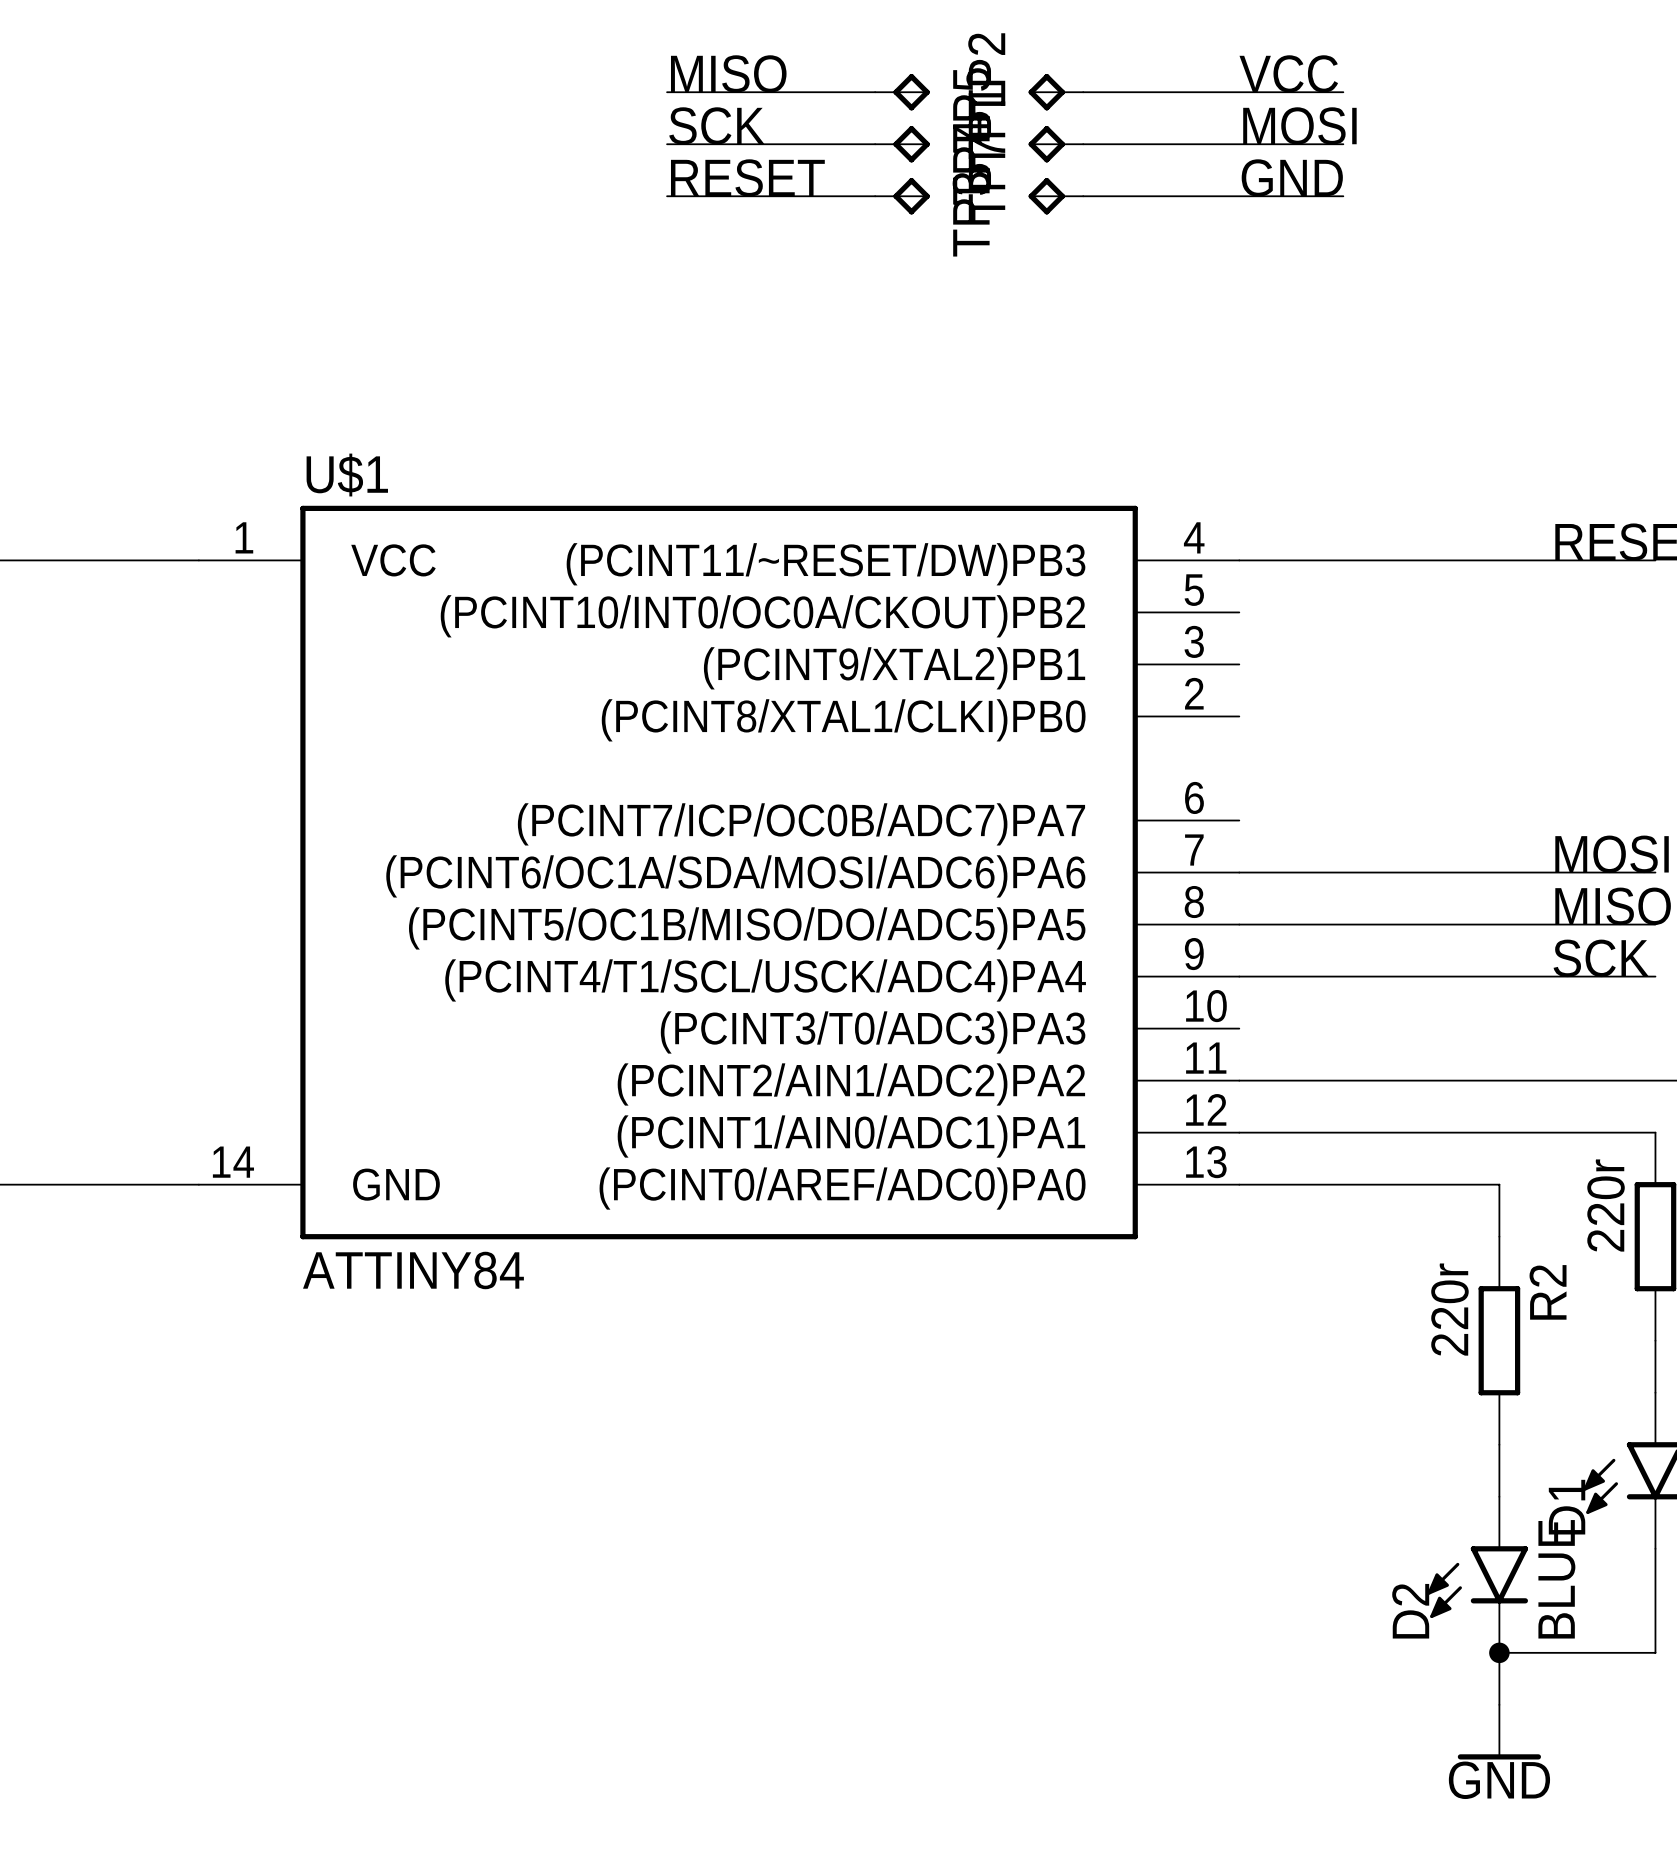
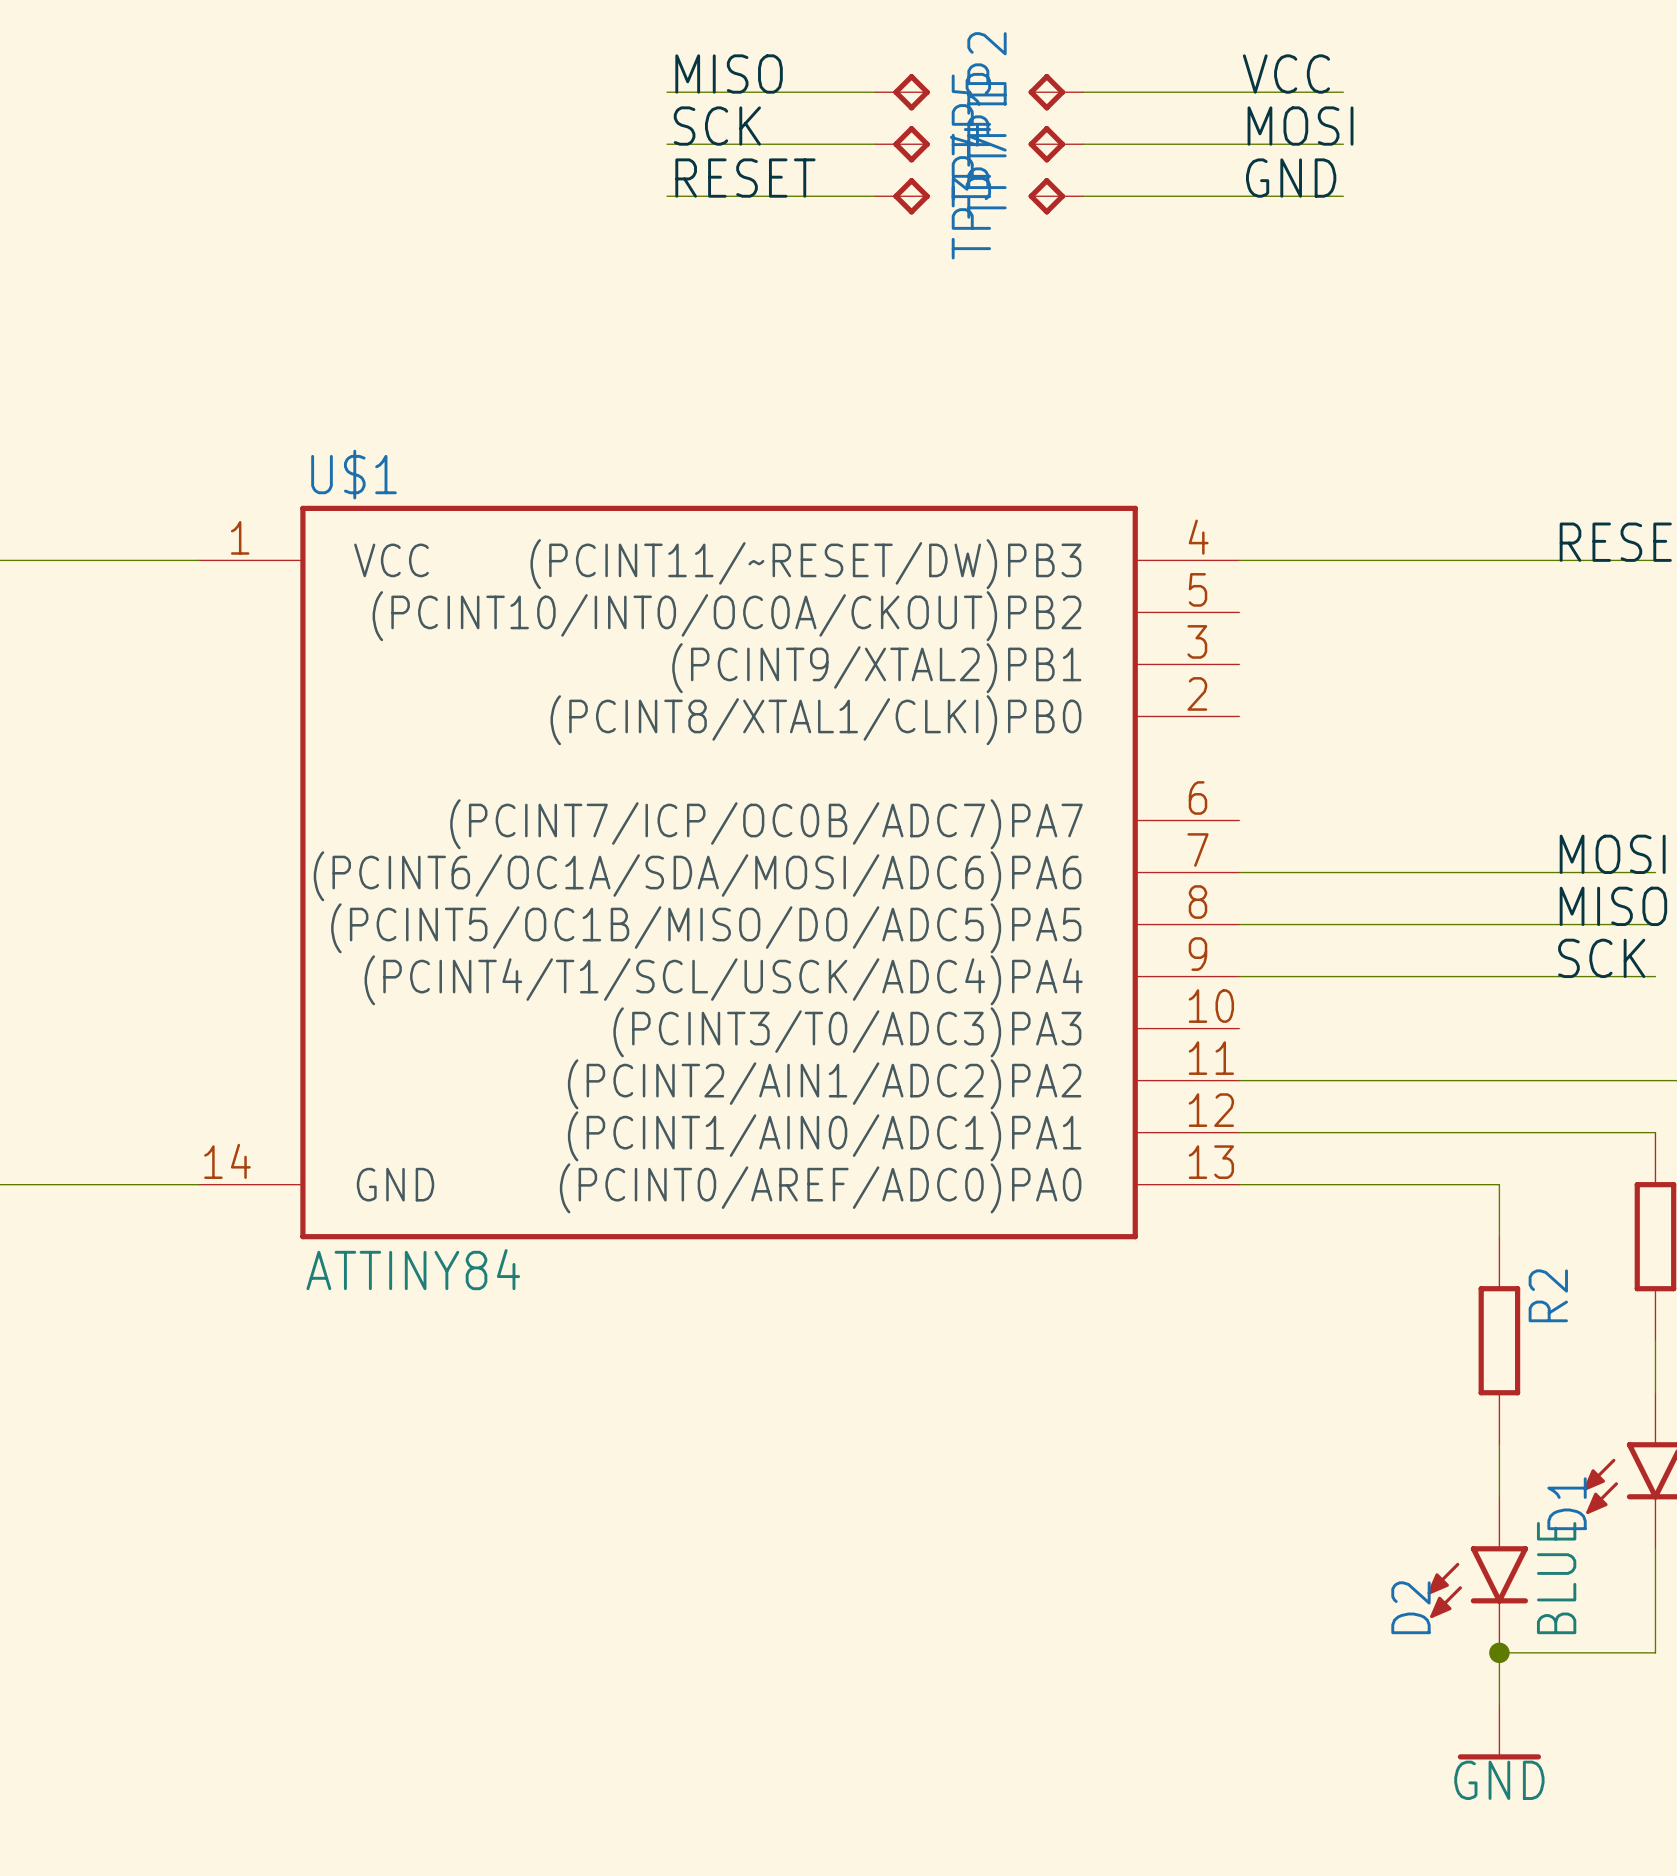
part value: 220r (1606, 1205) -> none
R2 value: 220r (1449, 1309) -> none

